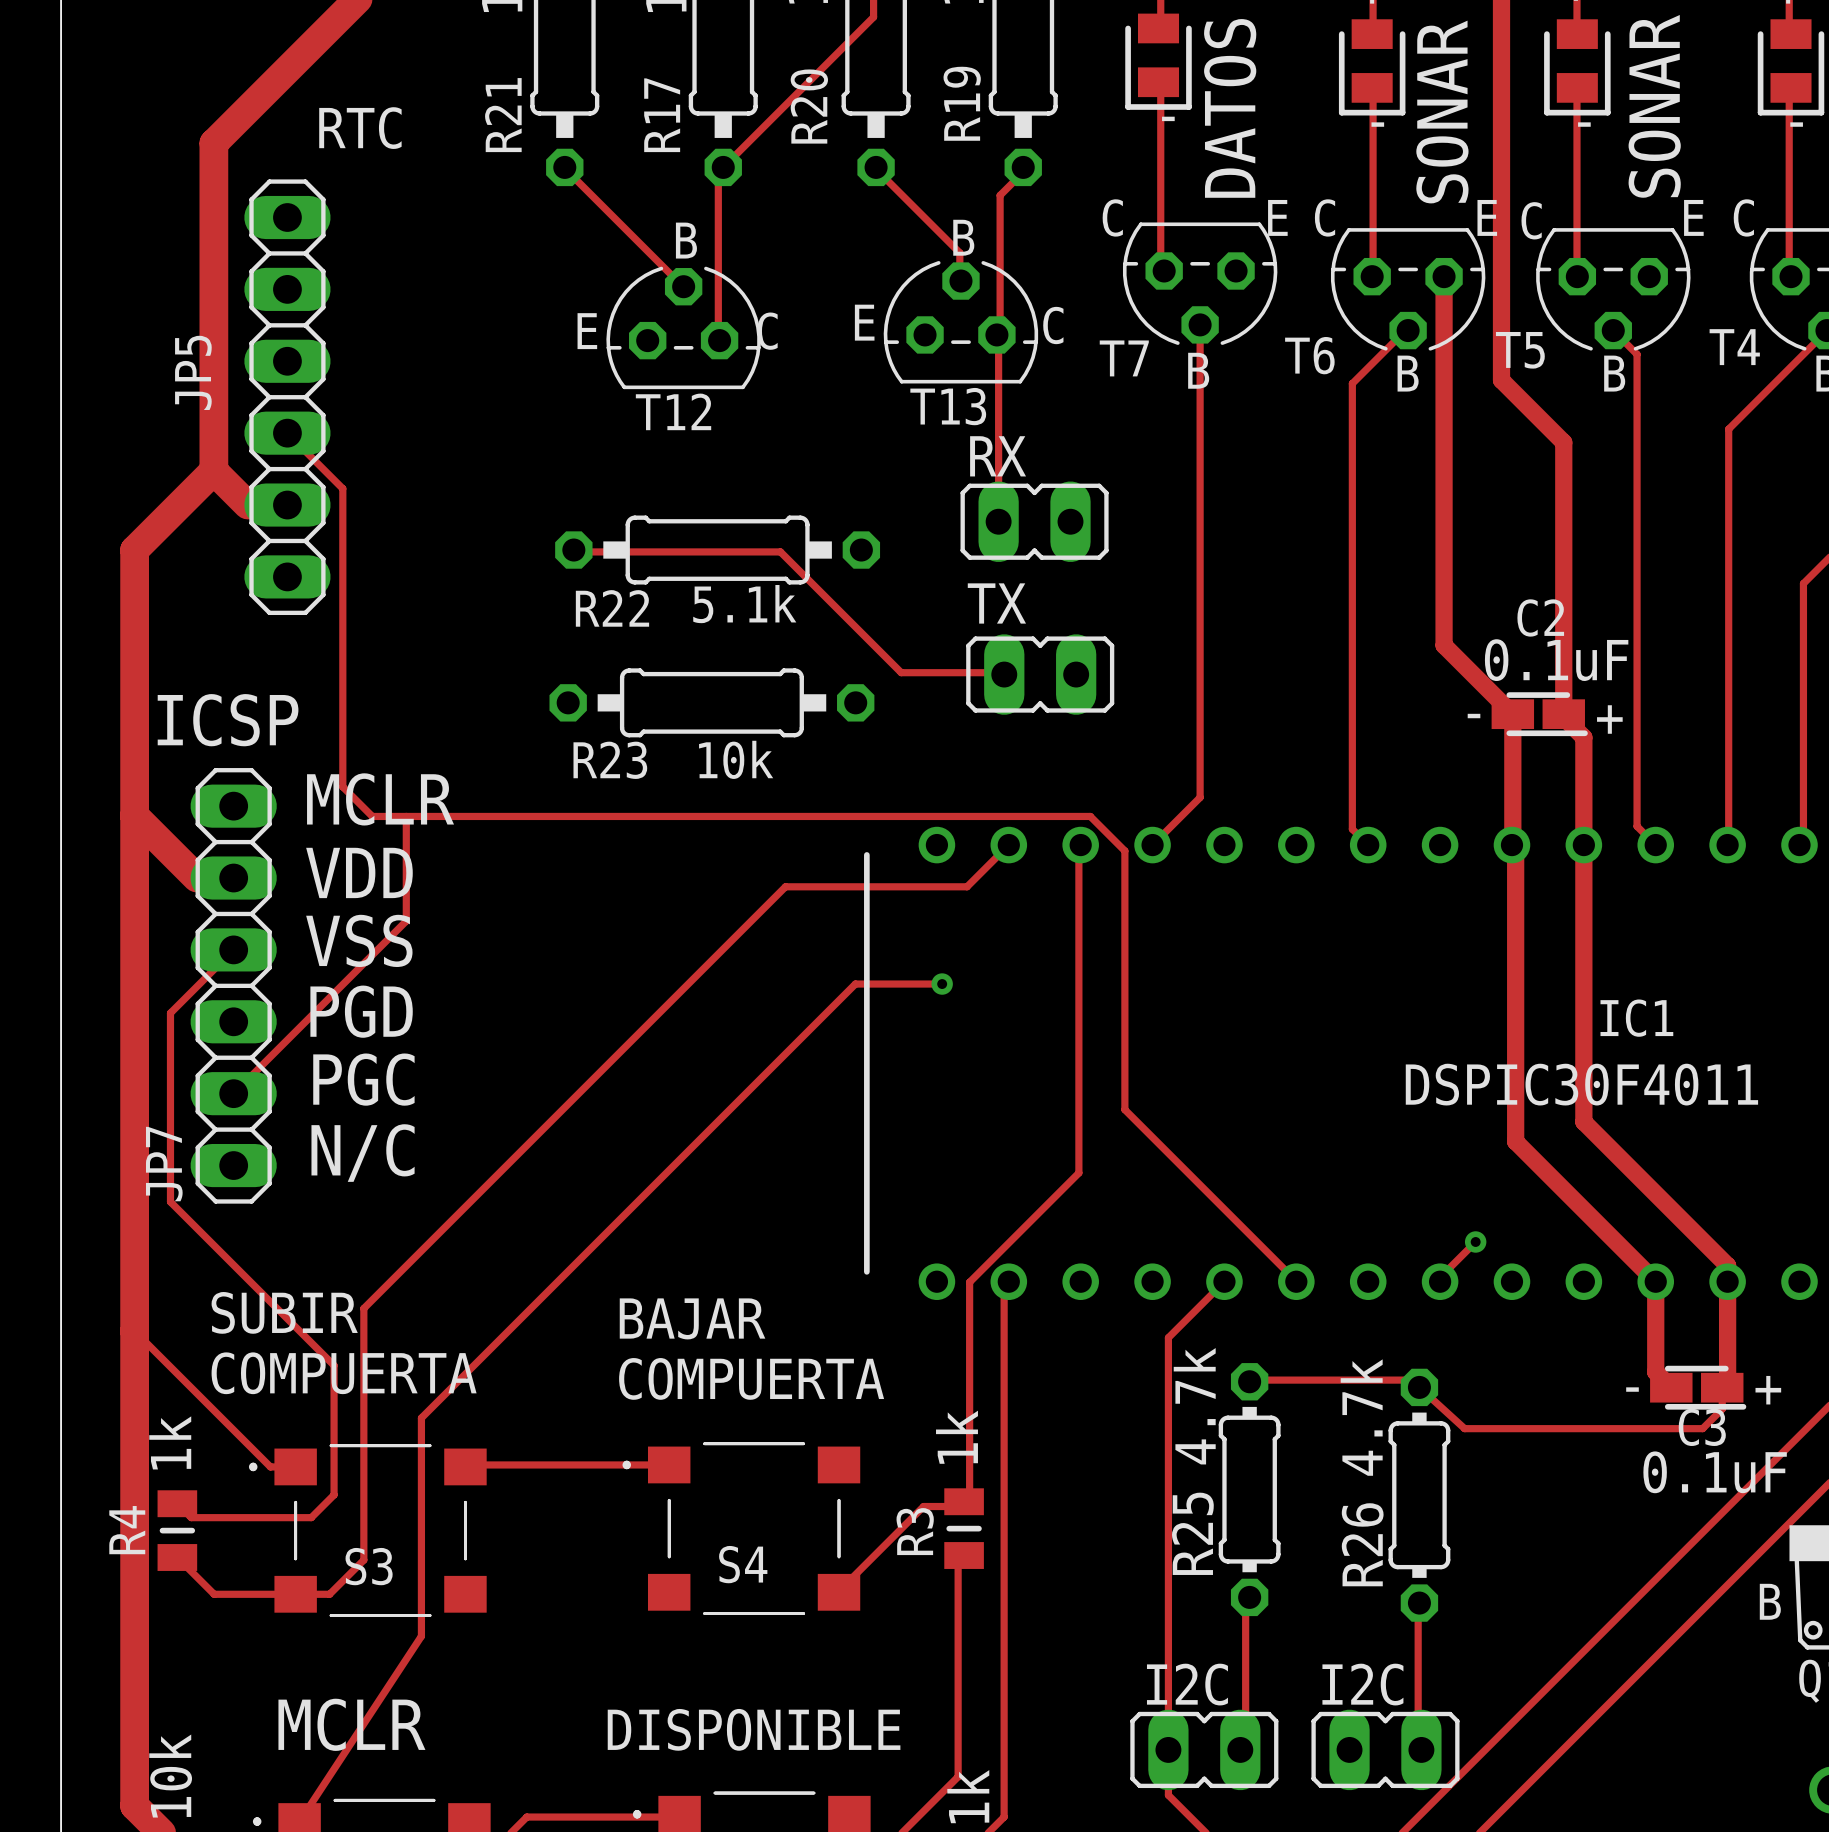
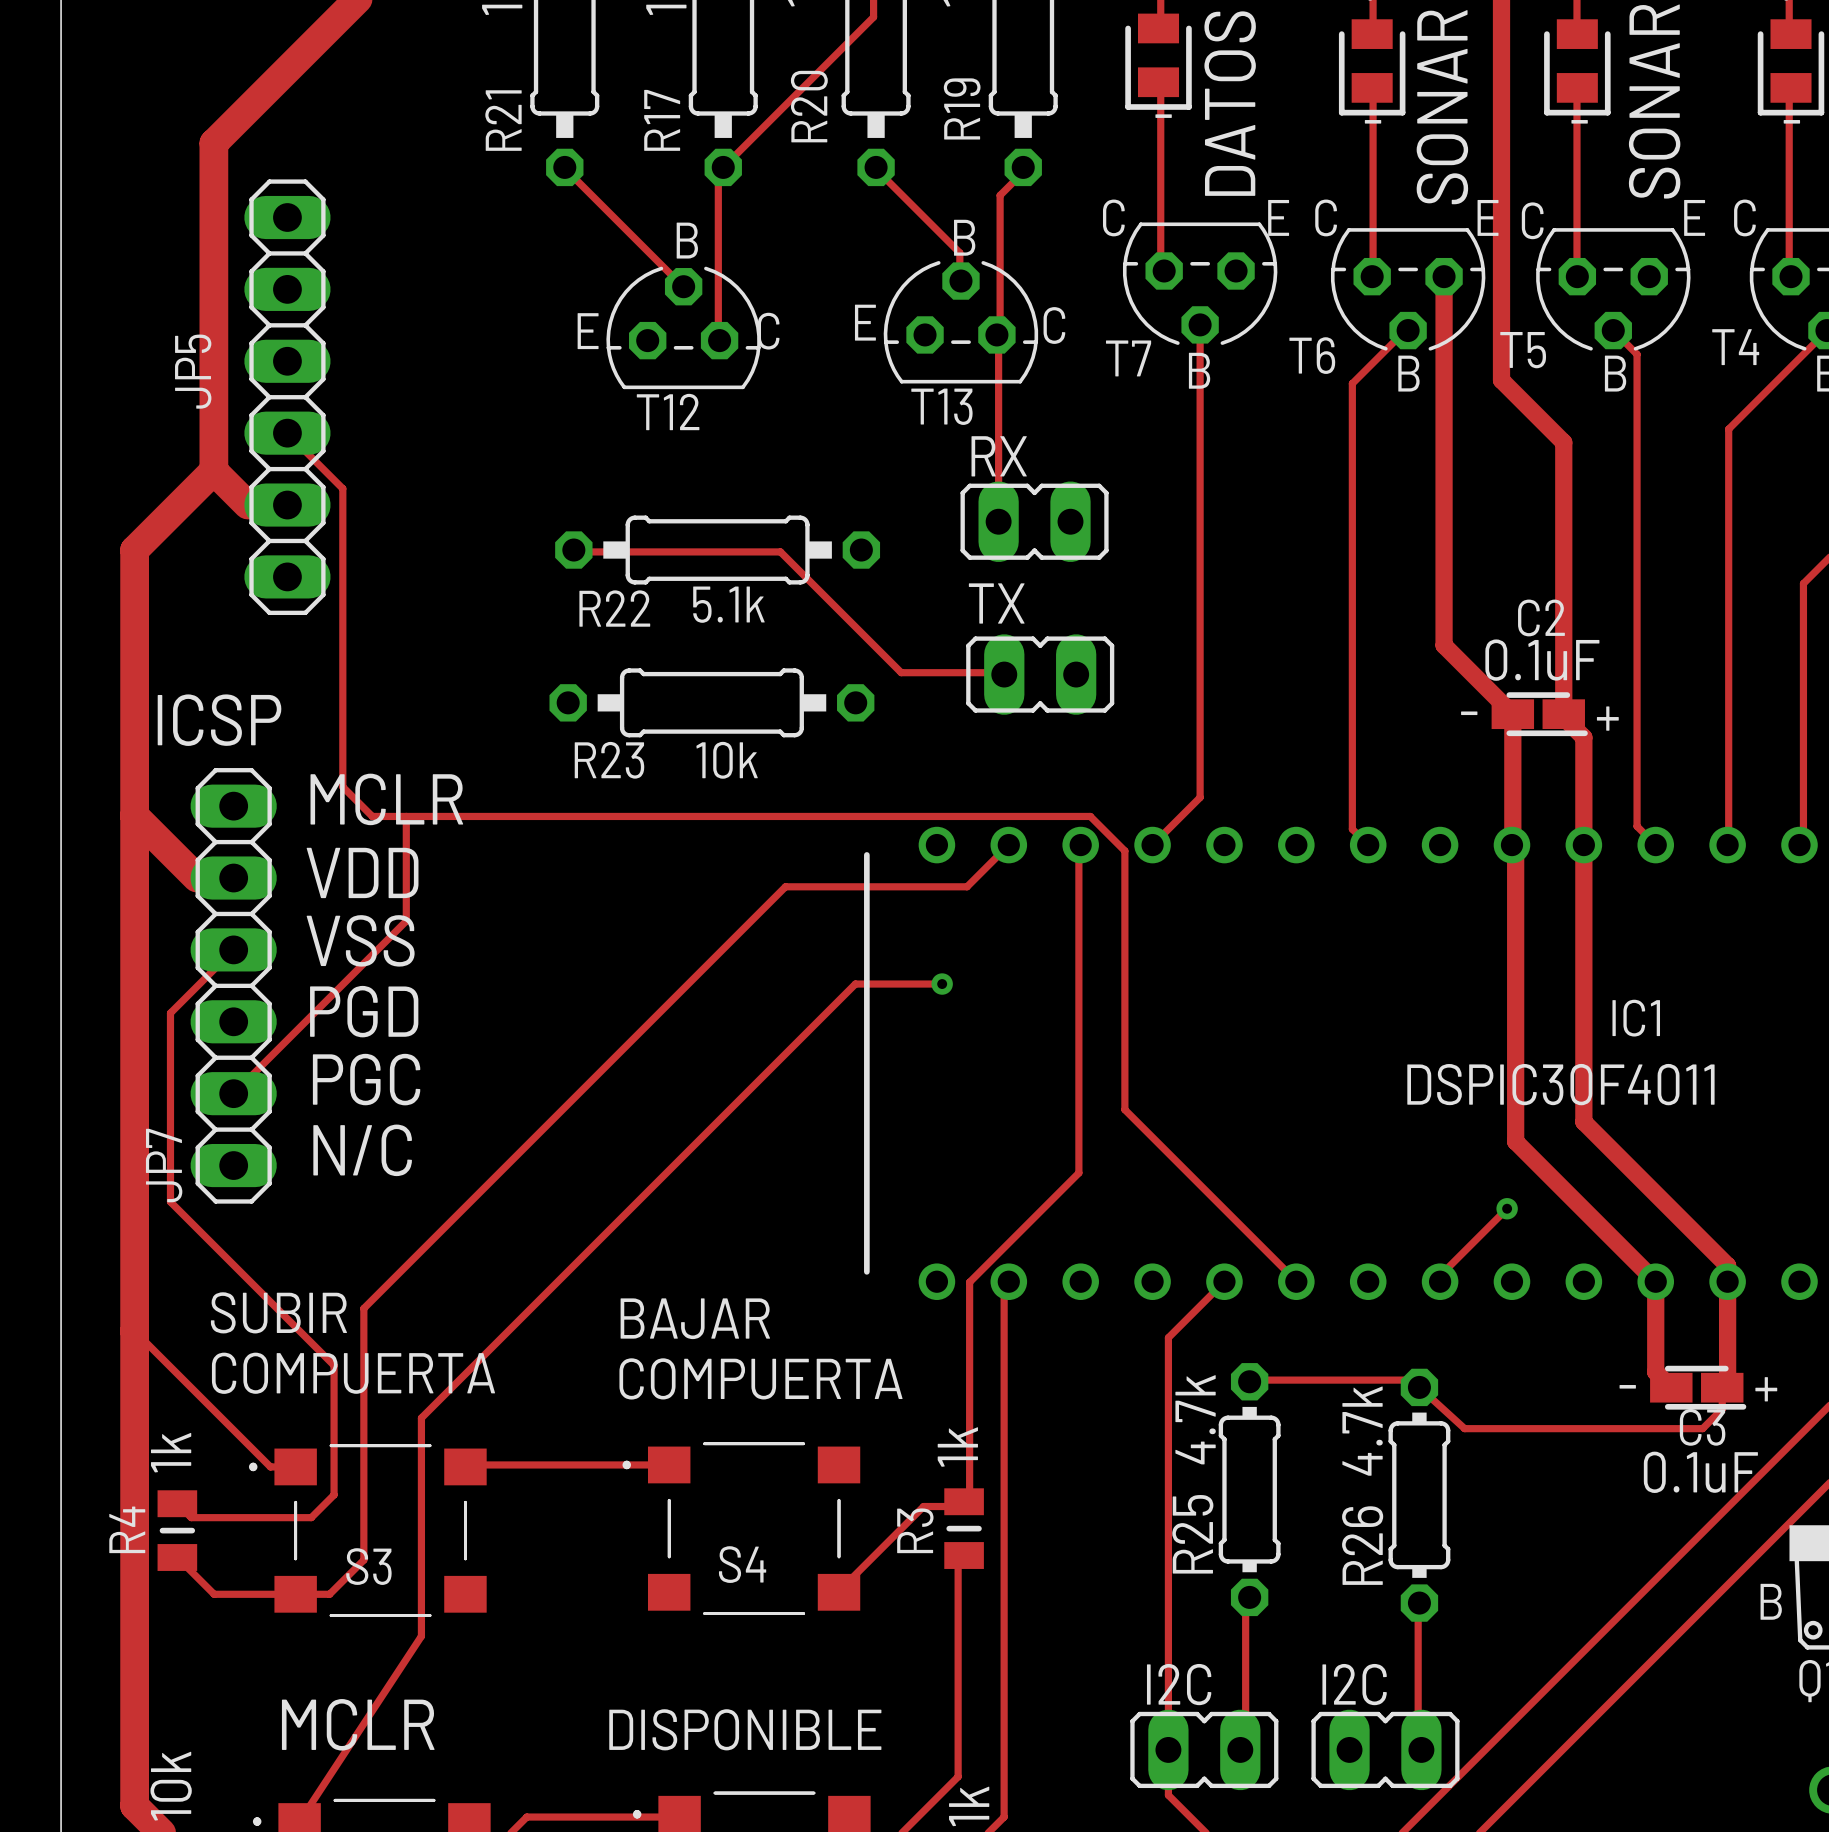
text: RTC (360, 128) -> none
track: (1475, 1241) (1441, 1276) -> (1507, 1208) (1441, 1276)
via position: (1475, 1241) -> (1507, 1208)

